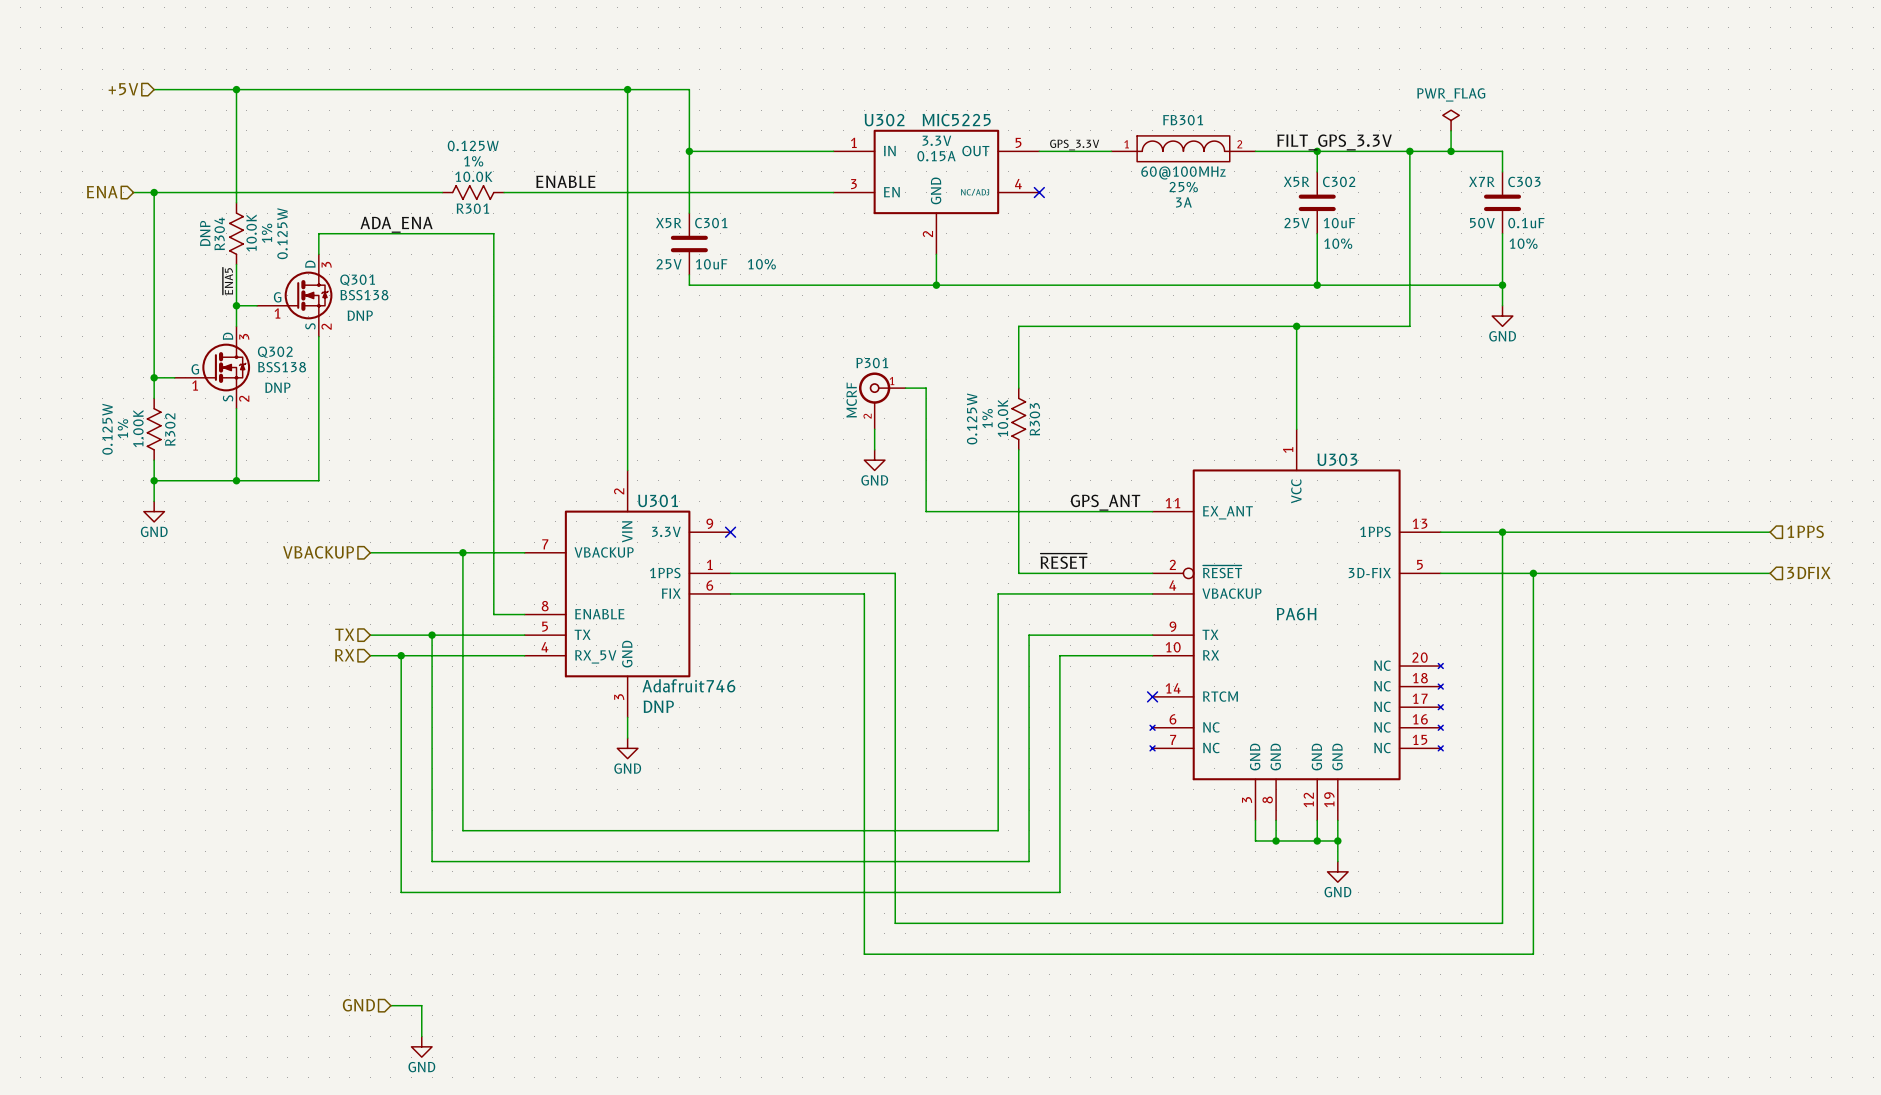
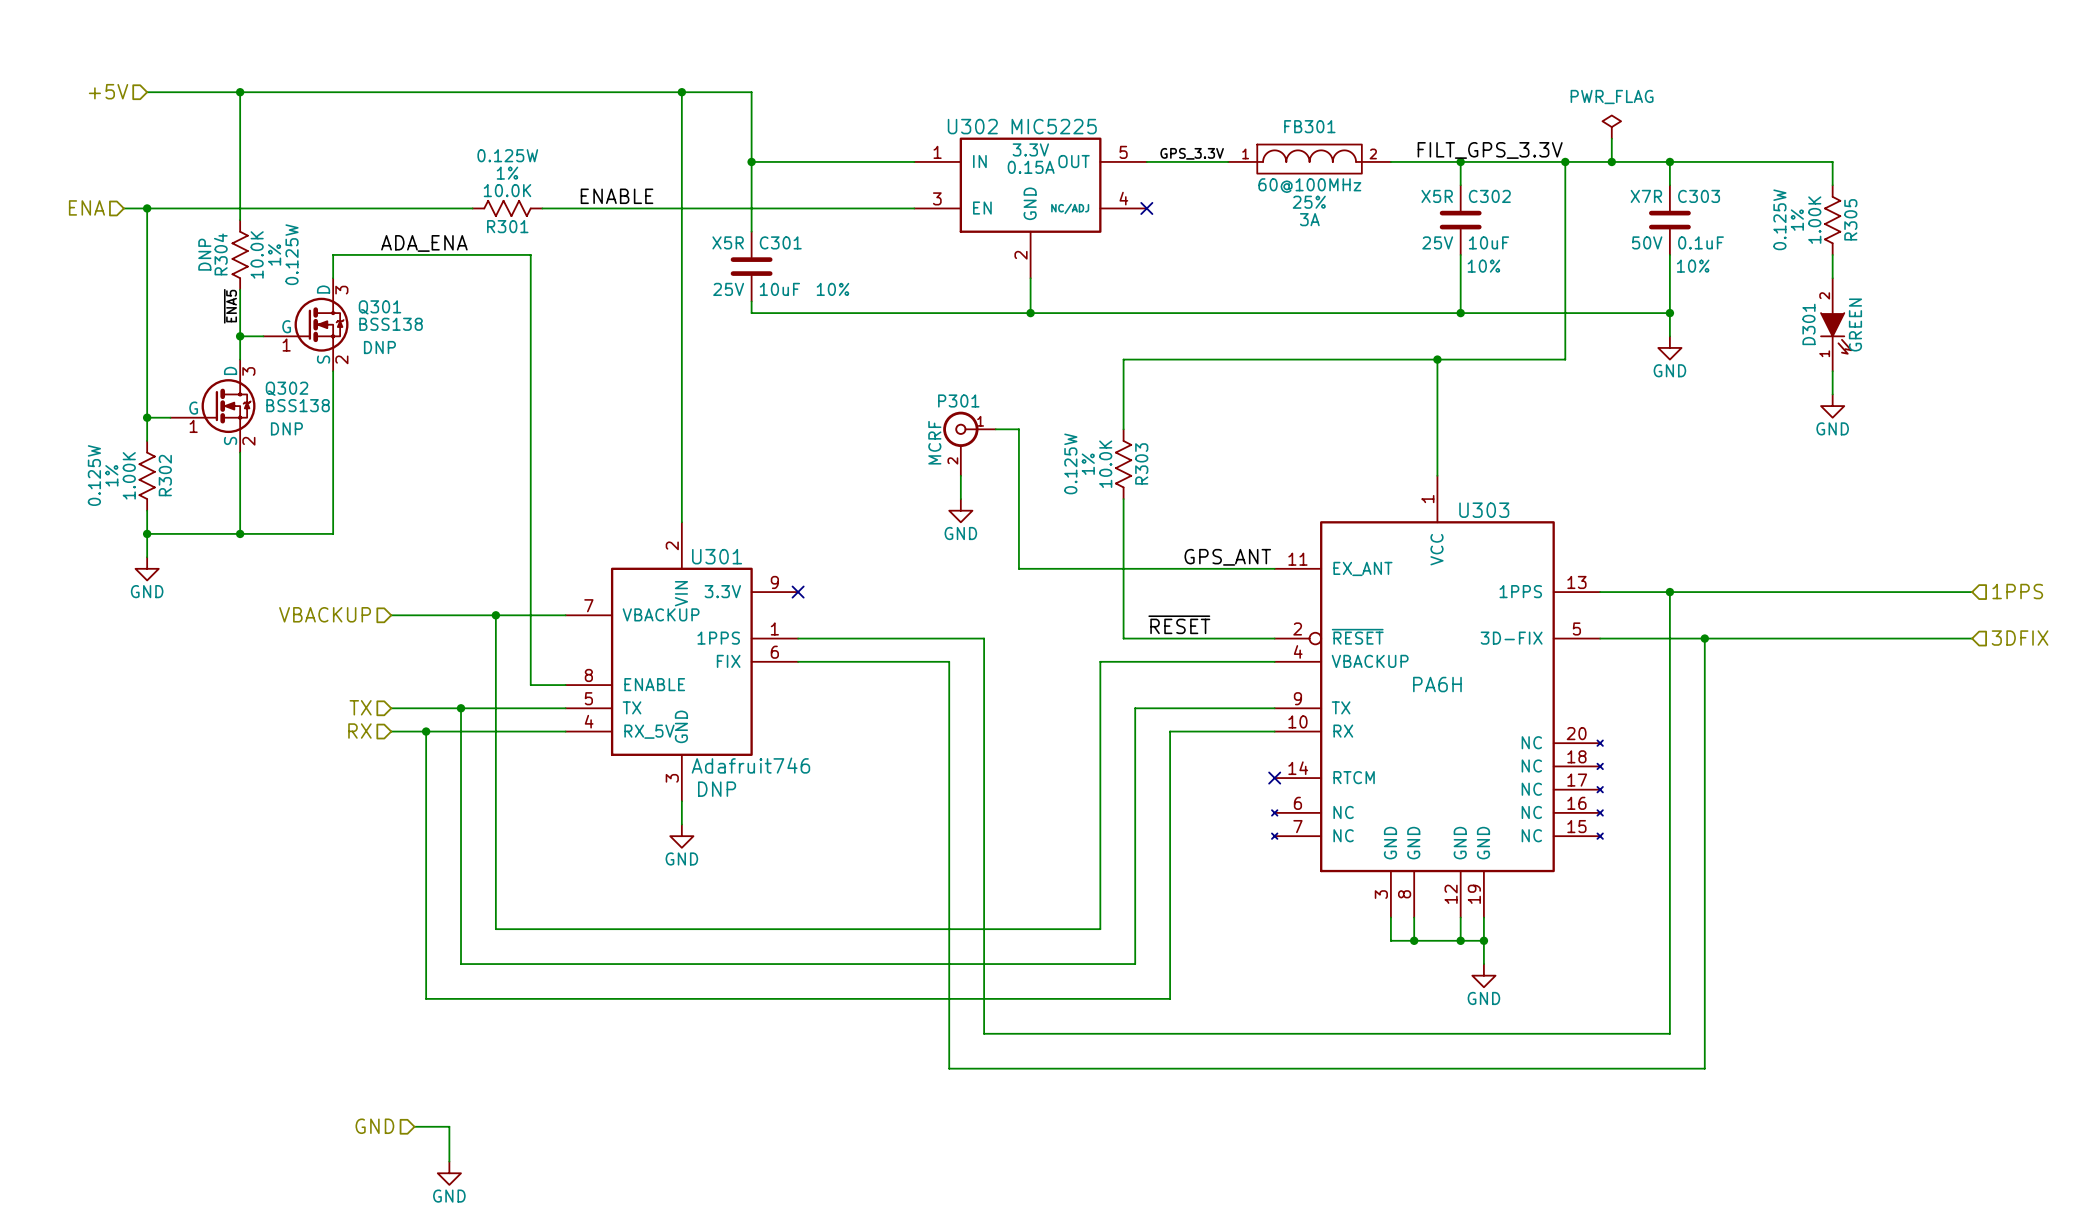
wire: none -> (1669, 161) (1832, 161) (1832, 185)
junction: none -> (1669, 161)
R305: none -> 1.00K (1832, 220)
wire: none -> (1832, 254) (1832, 278)
D301: none -> GREEN (1836, 324)
wire: none -> (1832, 371) (1832, 394)
power symbol: none -> GND (1832, 406)

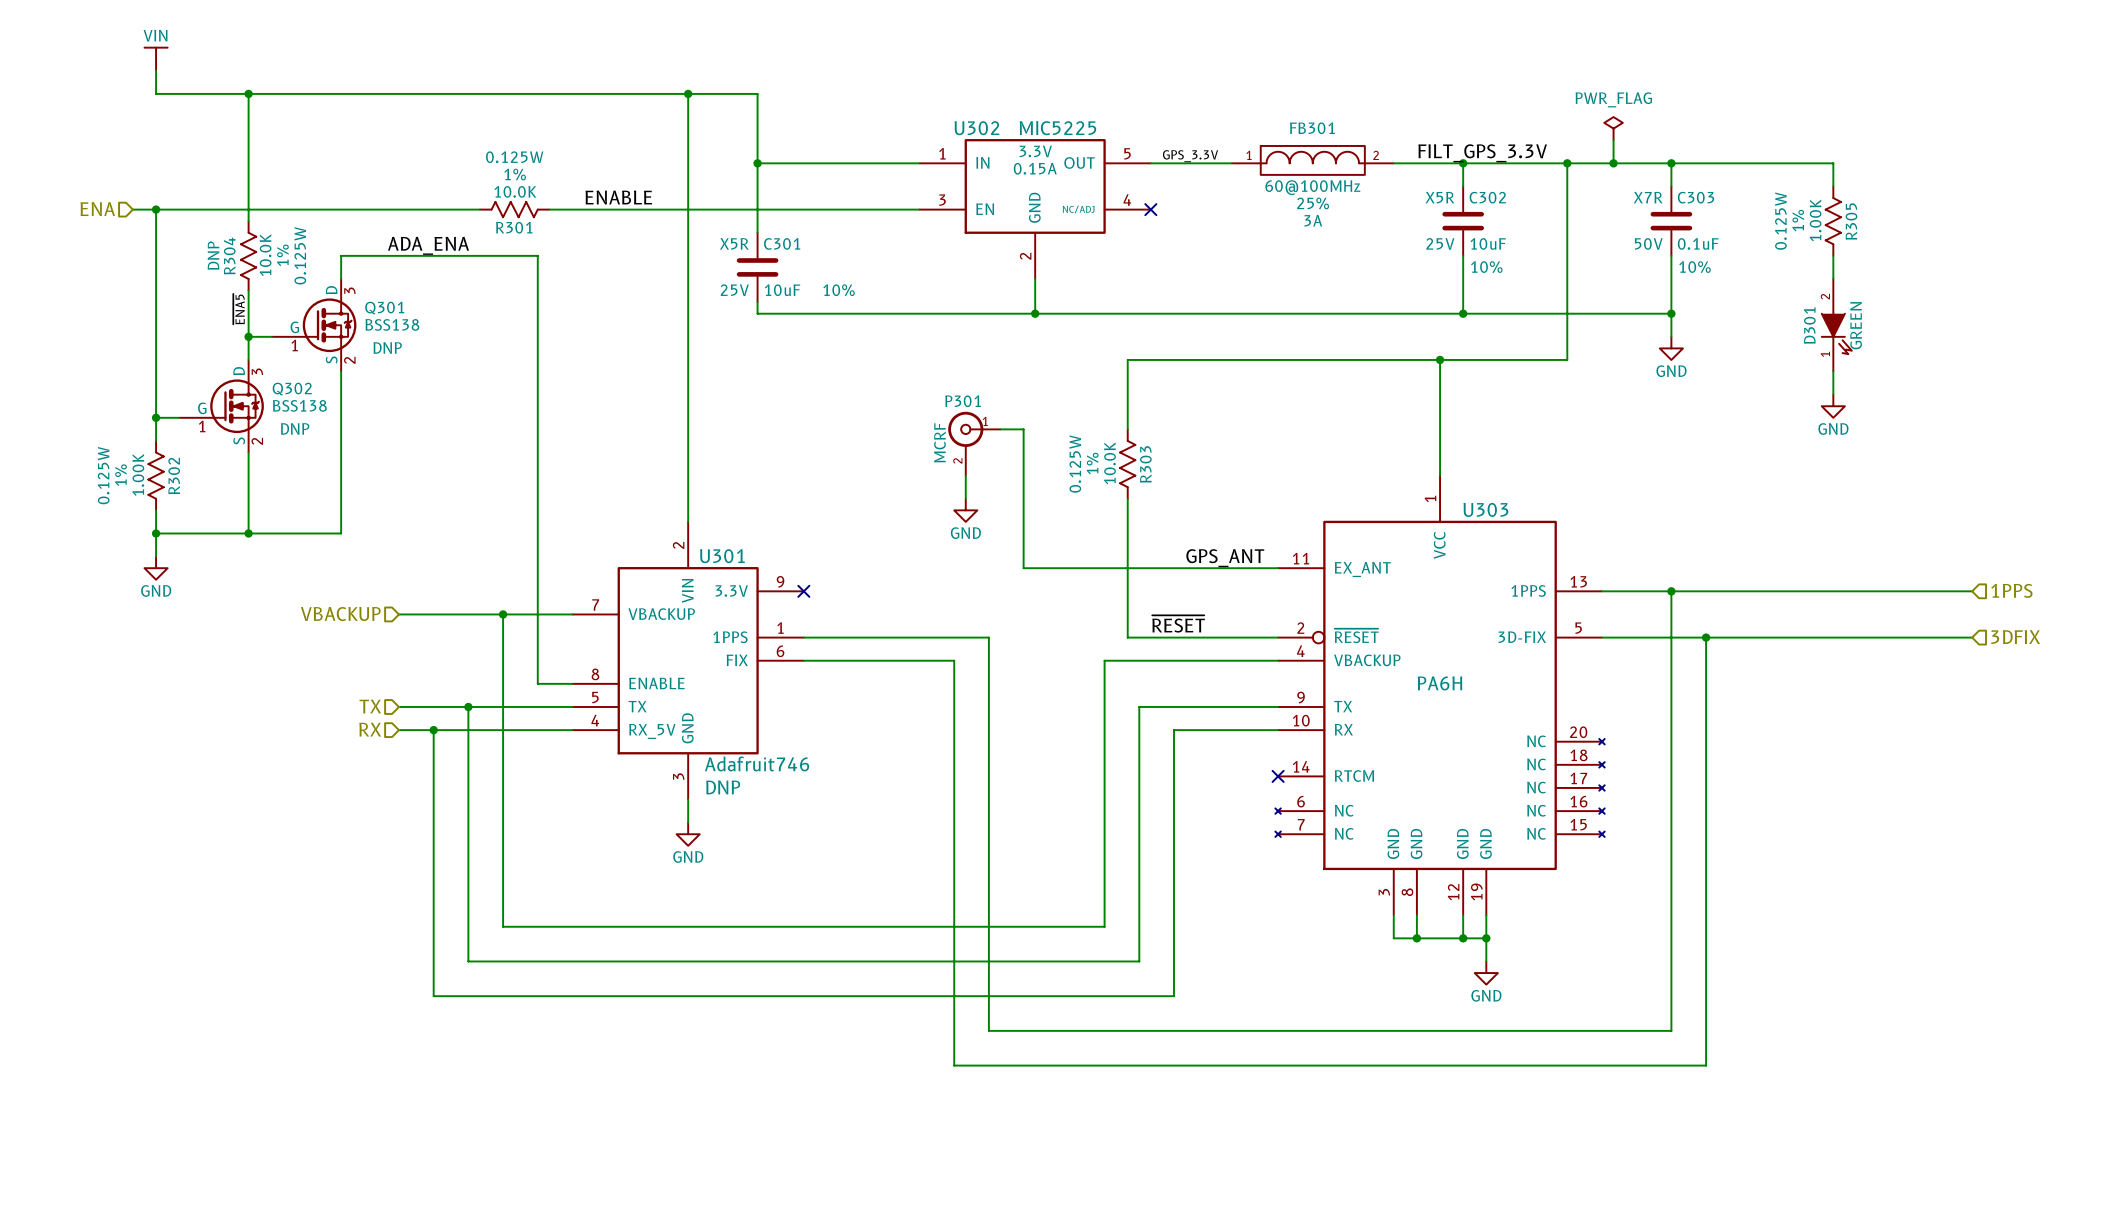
power symbol: none -> VIN (156, 59)
wire: none -> (156, 70) (156, 93)
hierarchical label: +5V (108, 91) -> none
hierarchical label: GND (374, 1126) -> none
wire: (414, 1126) (449, 1126) (449, 1161) -> none
power symbol: GND (449, 1173) -> none

